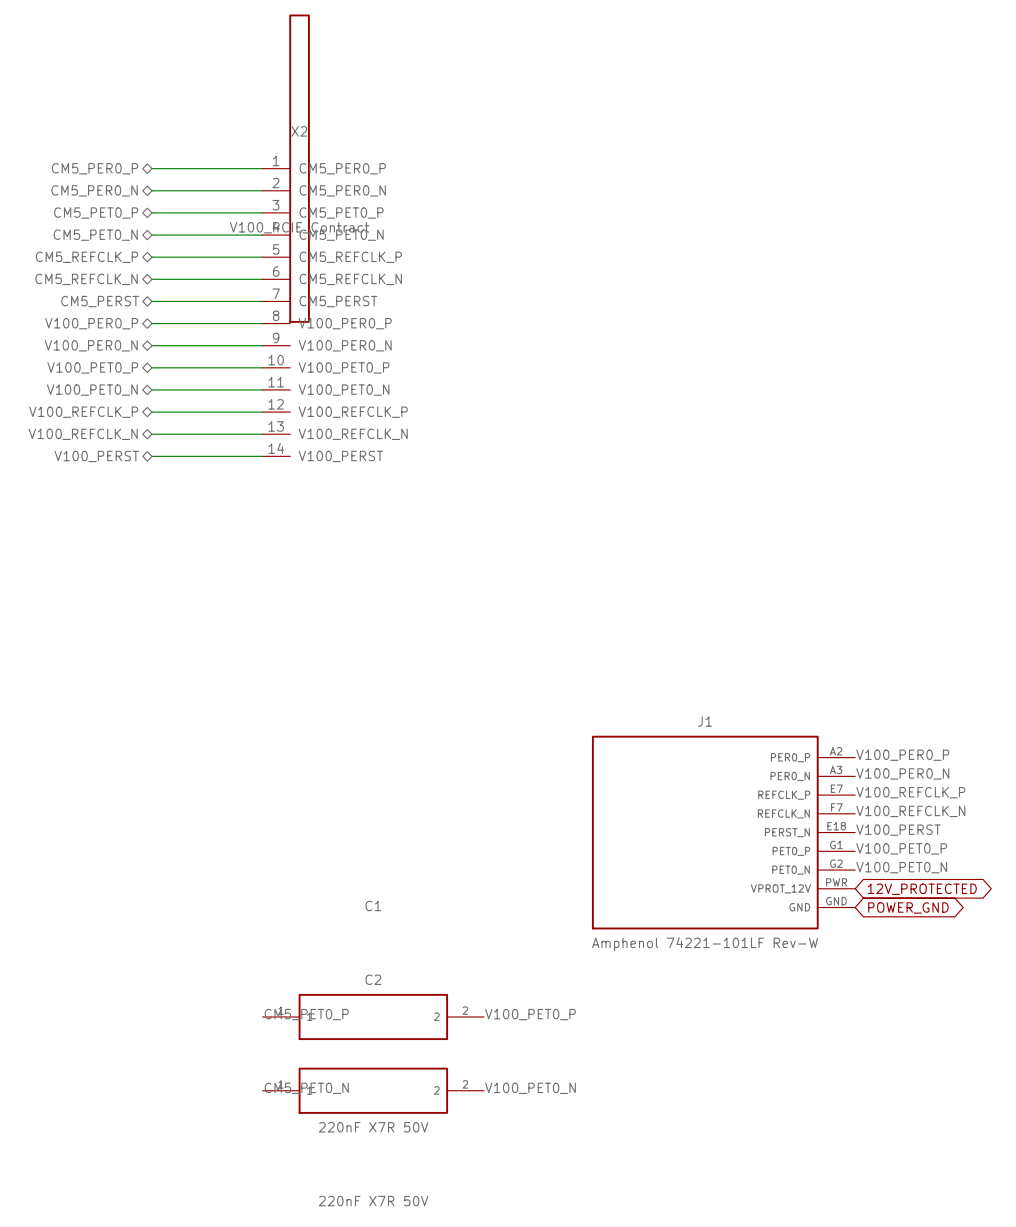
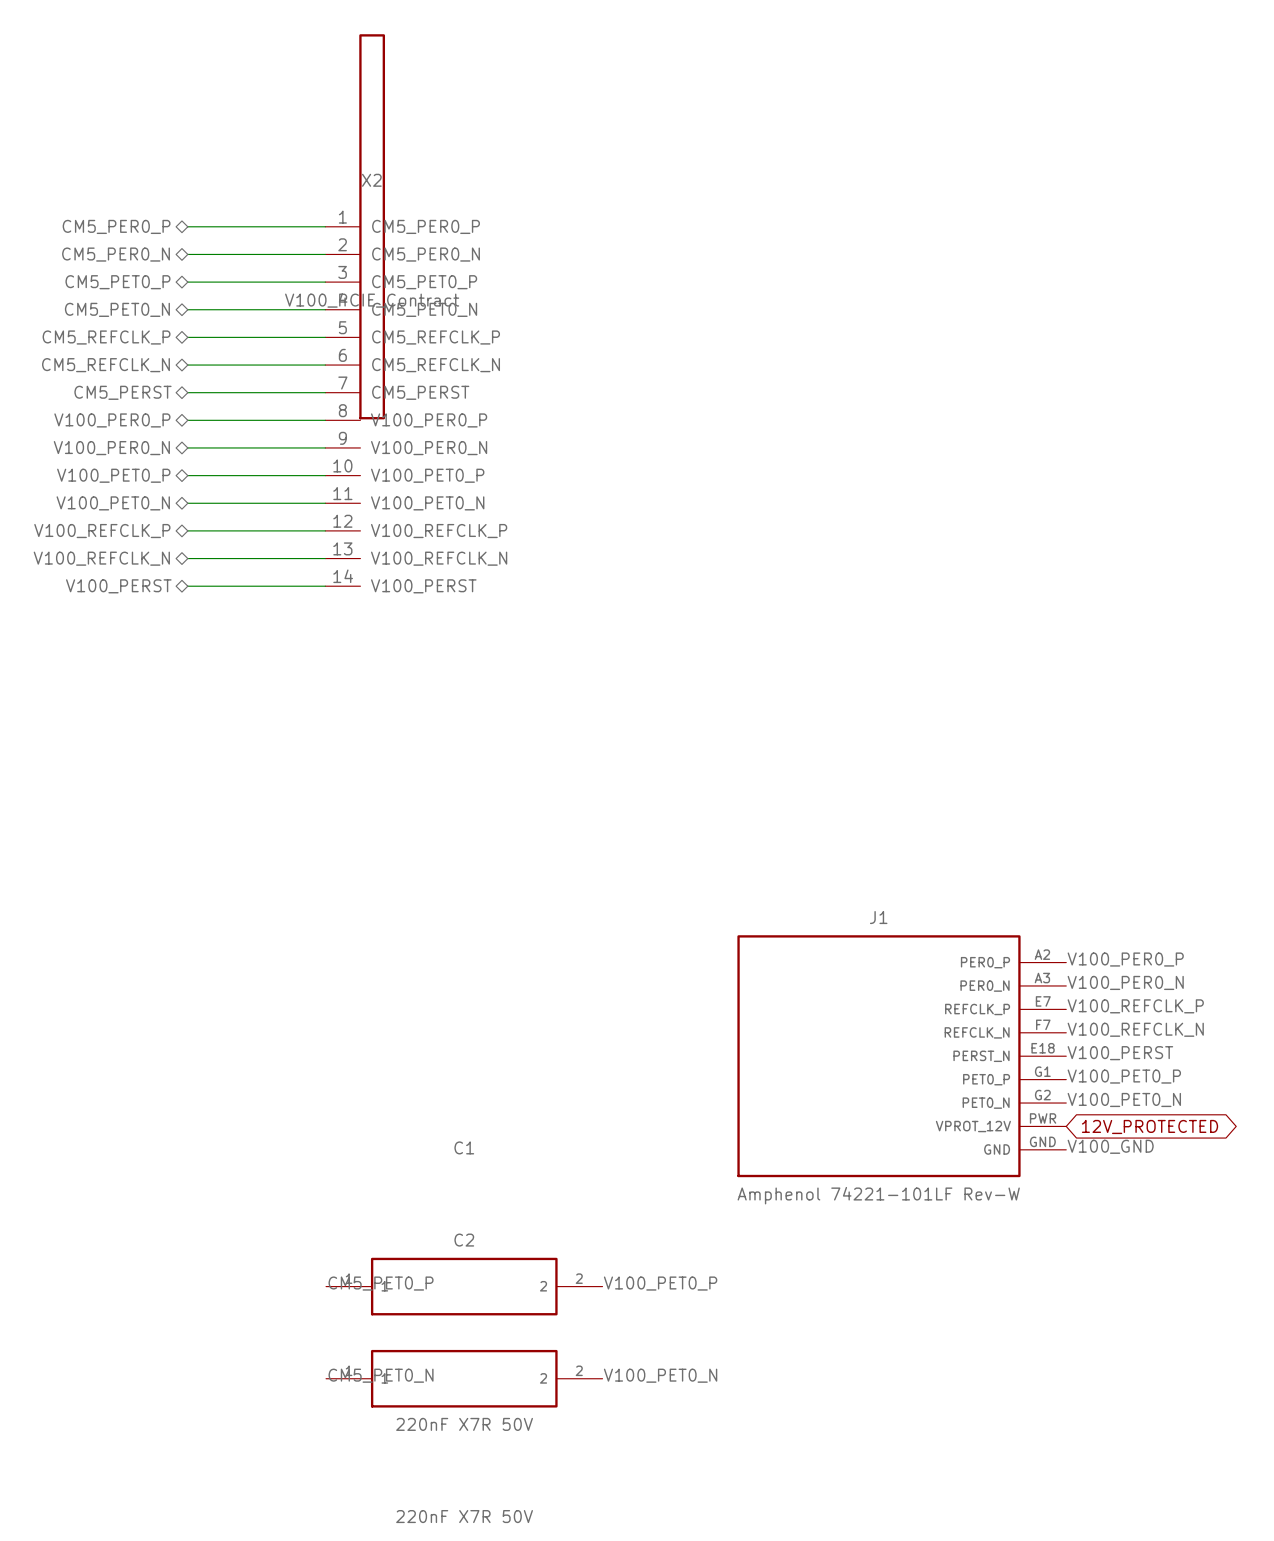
label: none -> V100_GND (1110, 1146)
global label: POWER_GND (908, 907) -> none

